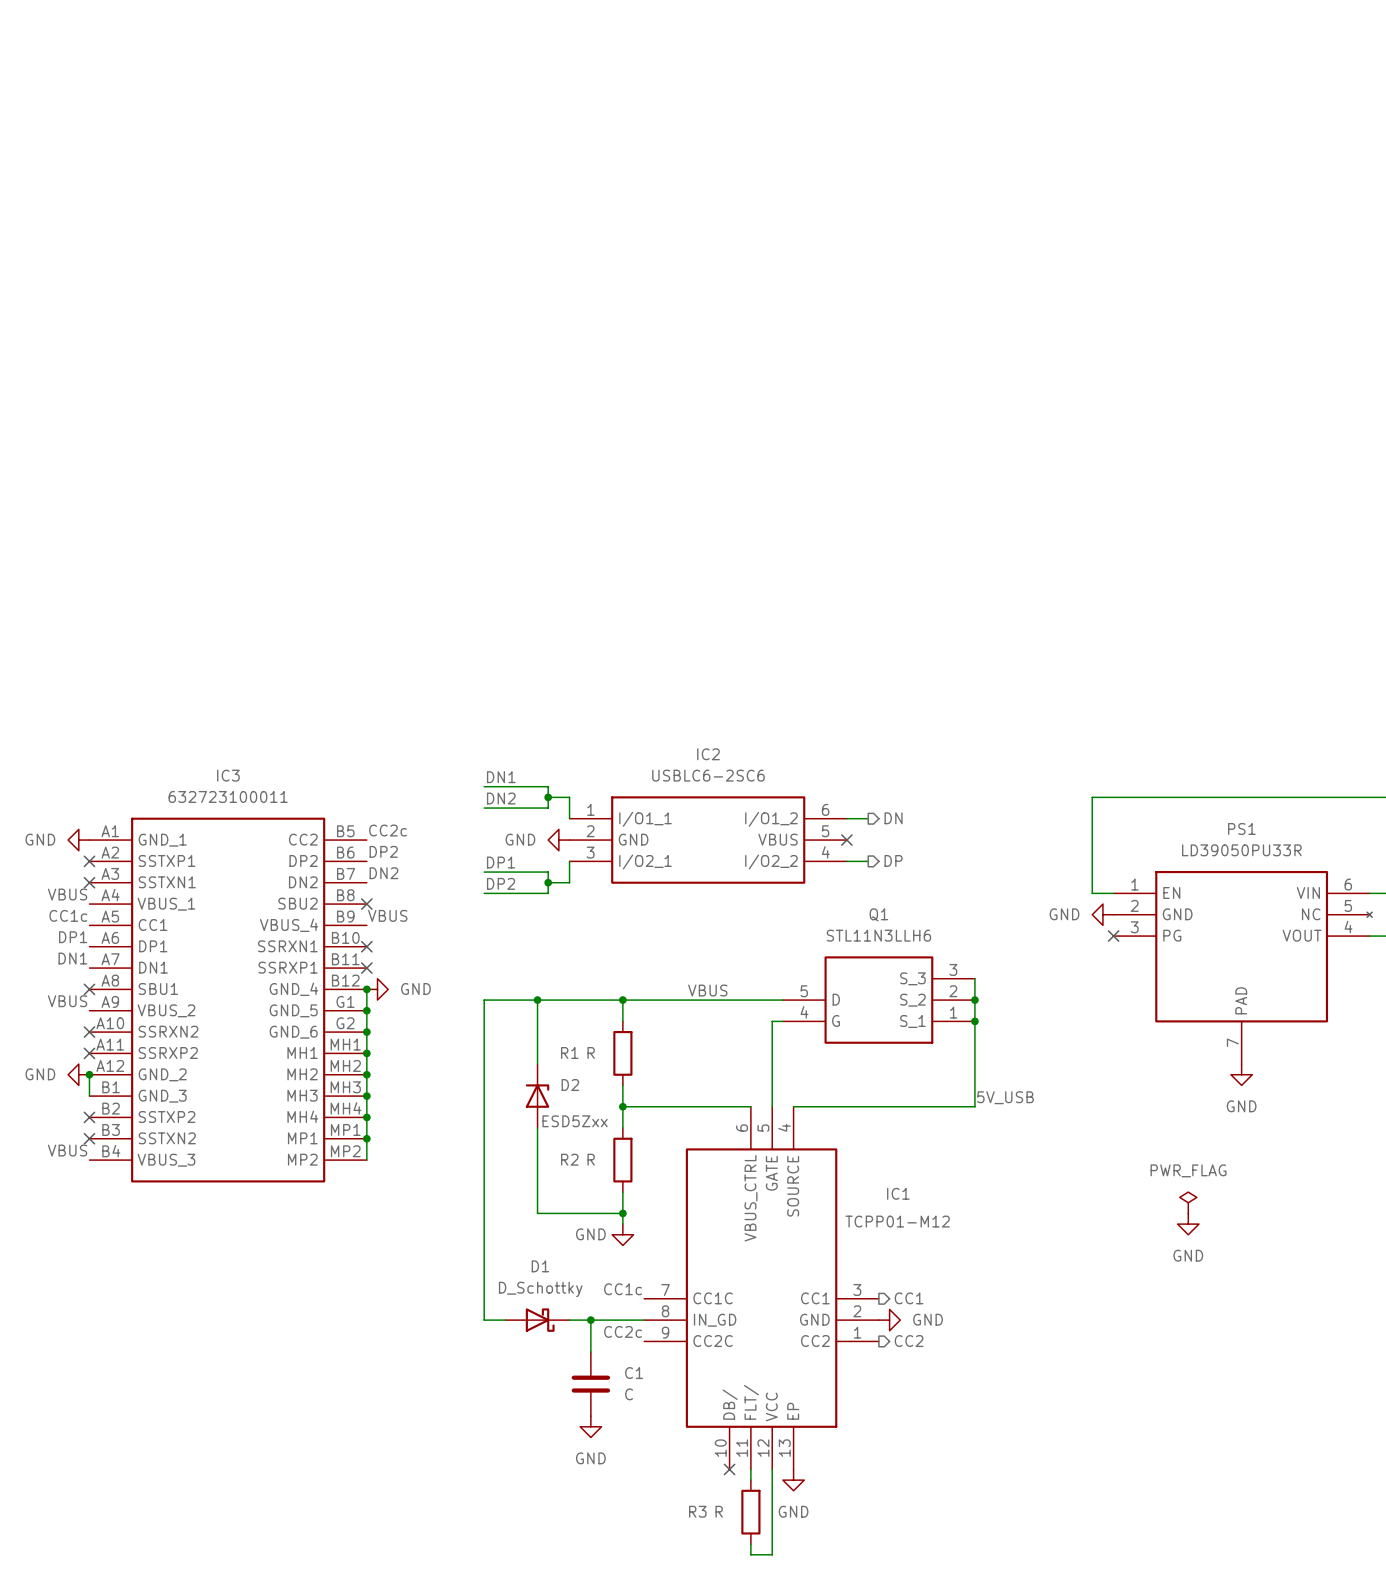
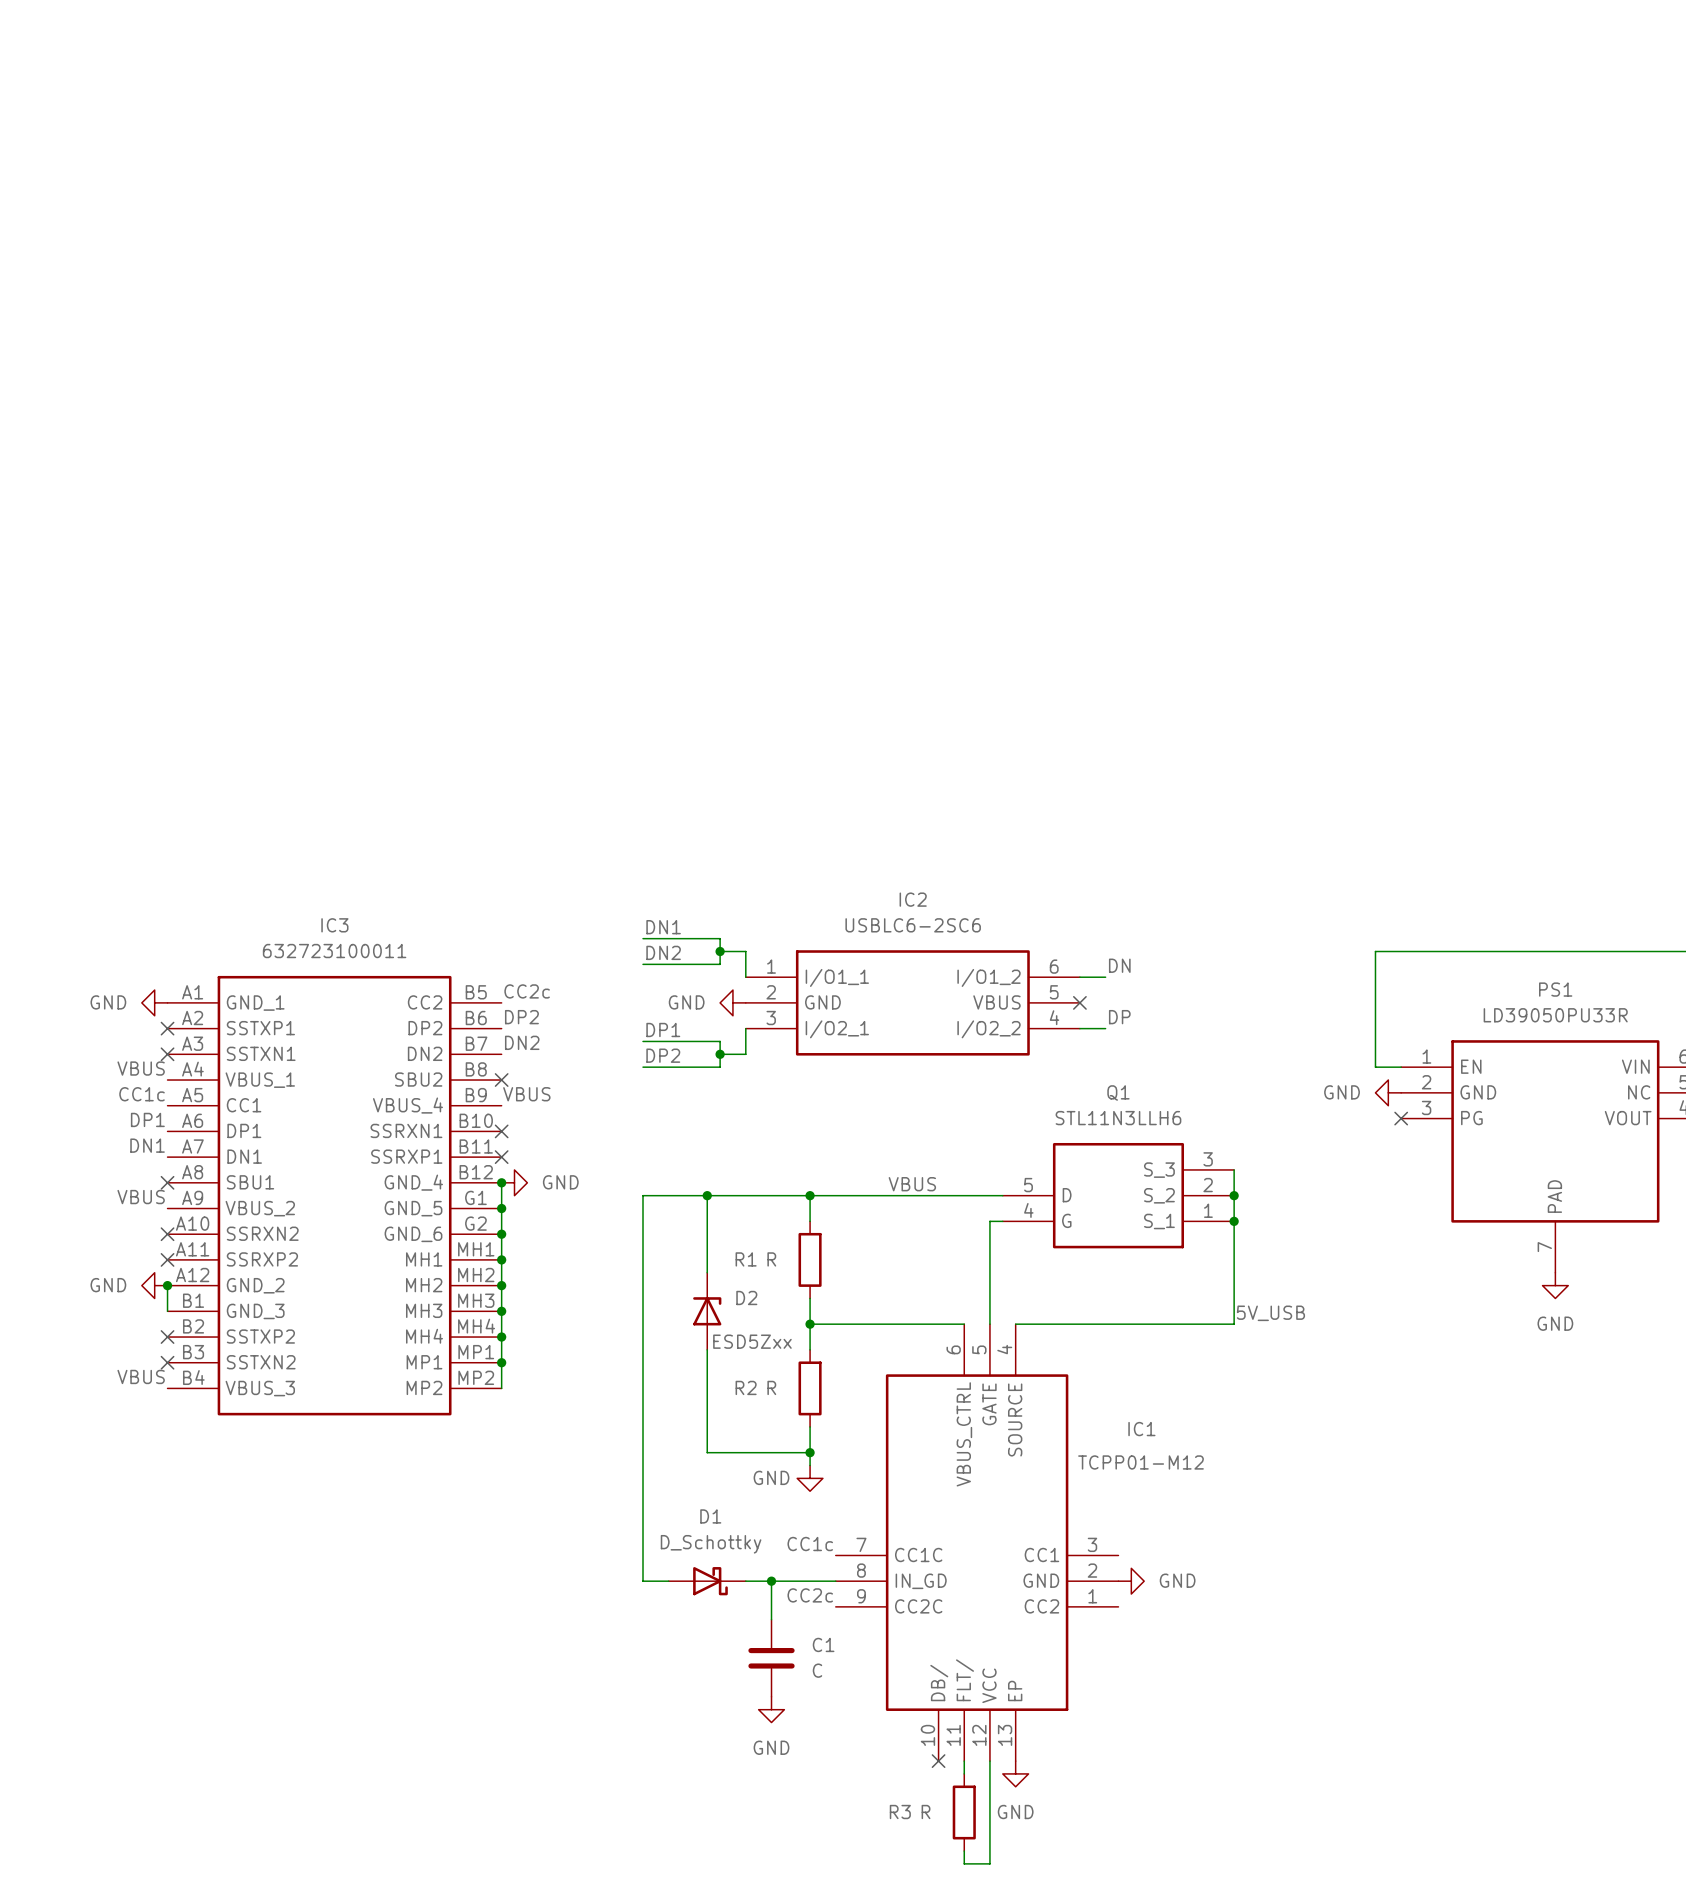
label: none -> DN (1119, 965)
hierarchical label: DN (893, 818) -> none
label: none -> DP (1119, 1017)
hierarchical label: DP (893, 860) -> none
power symbol: PWR_FLAG (1188, 1202) -> none
power symbol: GND (1188, 1224) -> none
hierarchical label: CC1 (909, 1298) -> none
hierarchical label: CC2 (909, 1341) -> none

